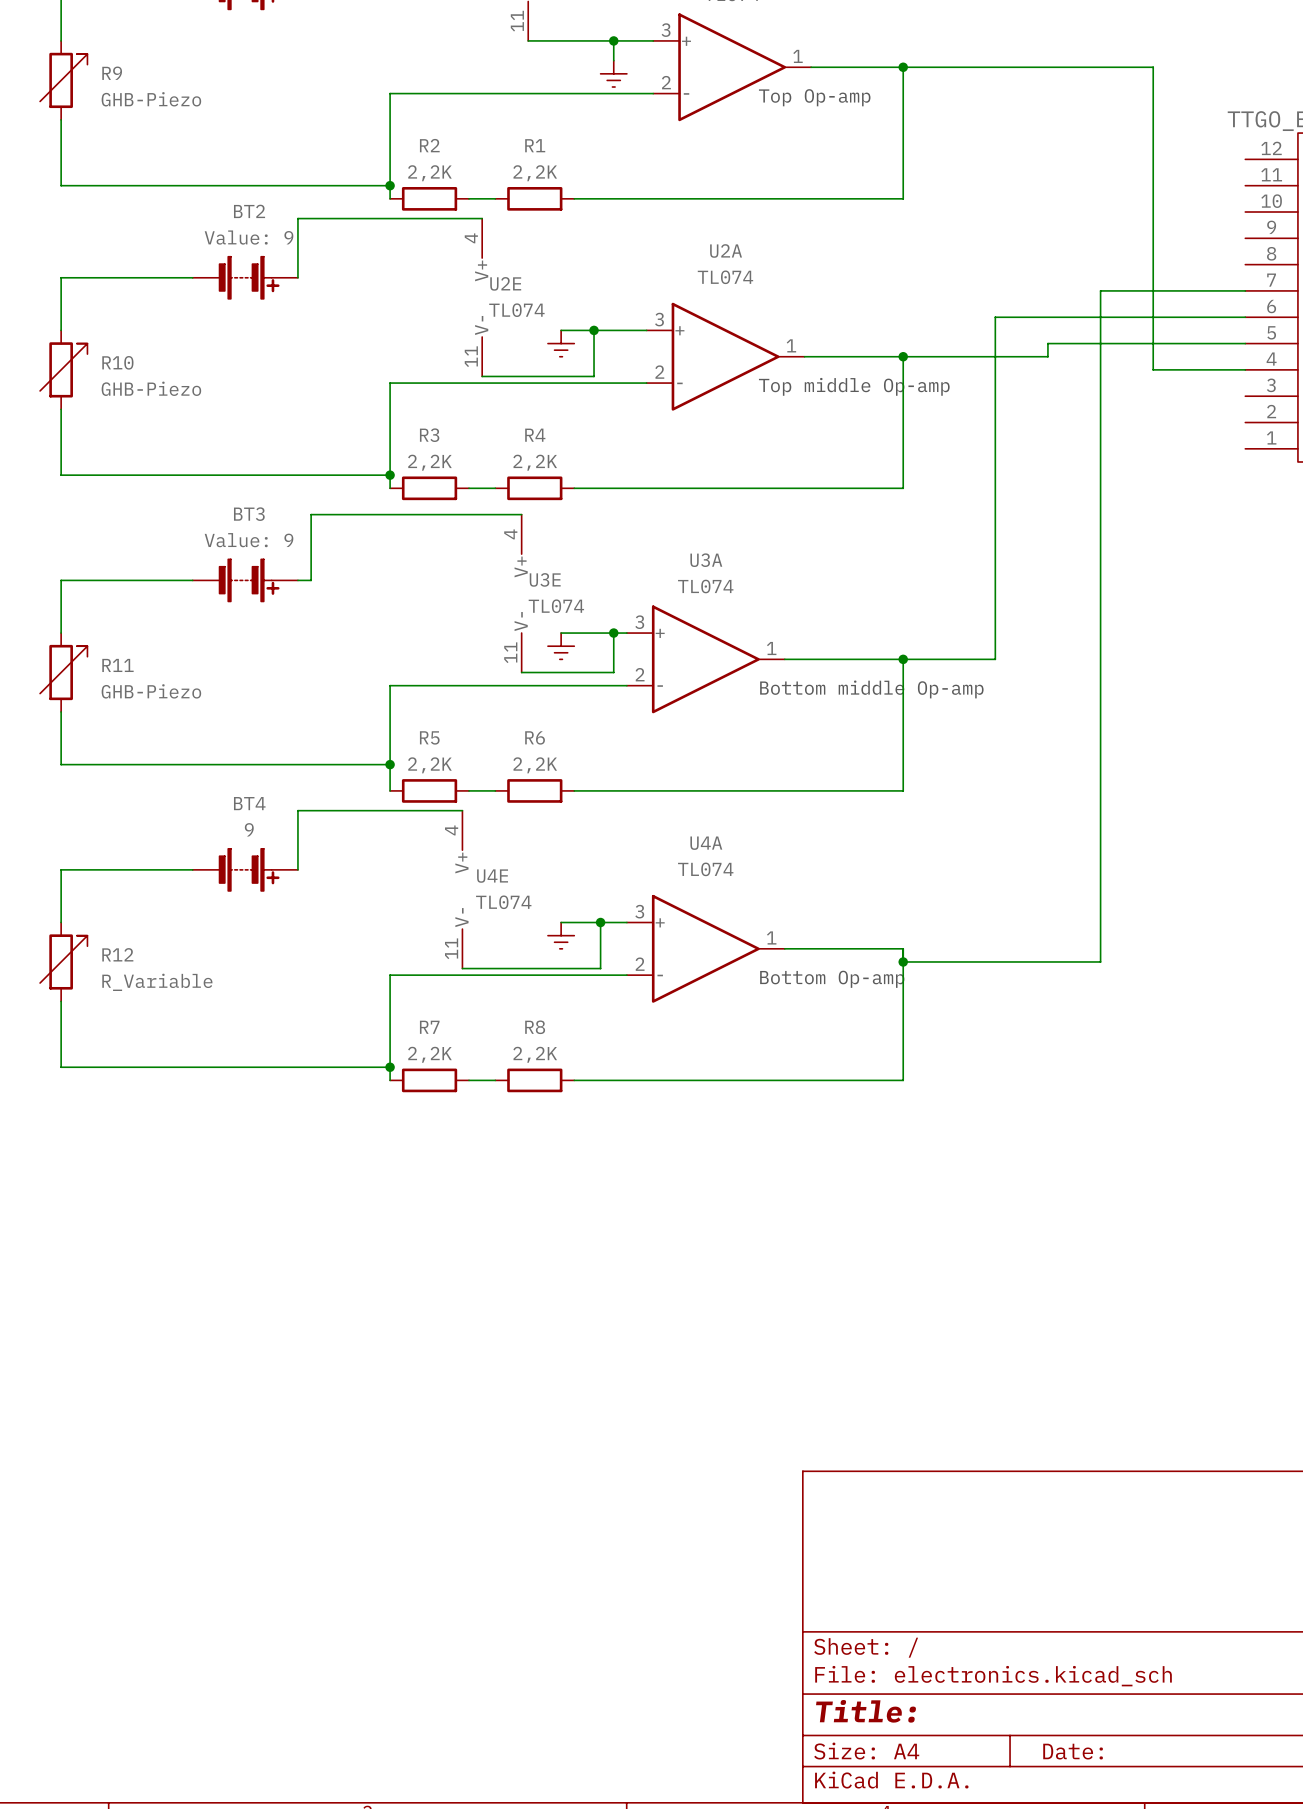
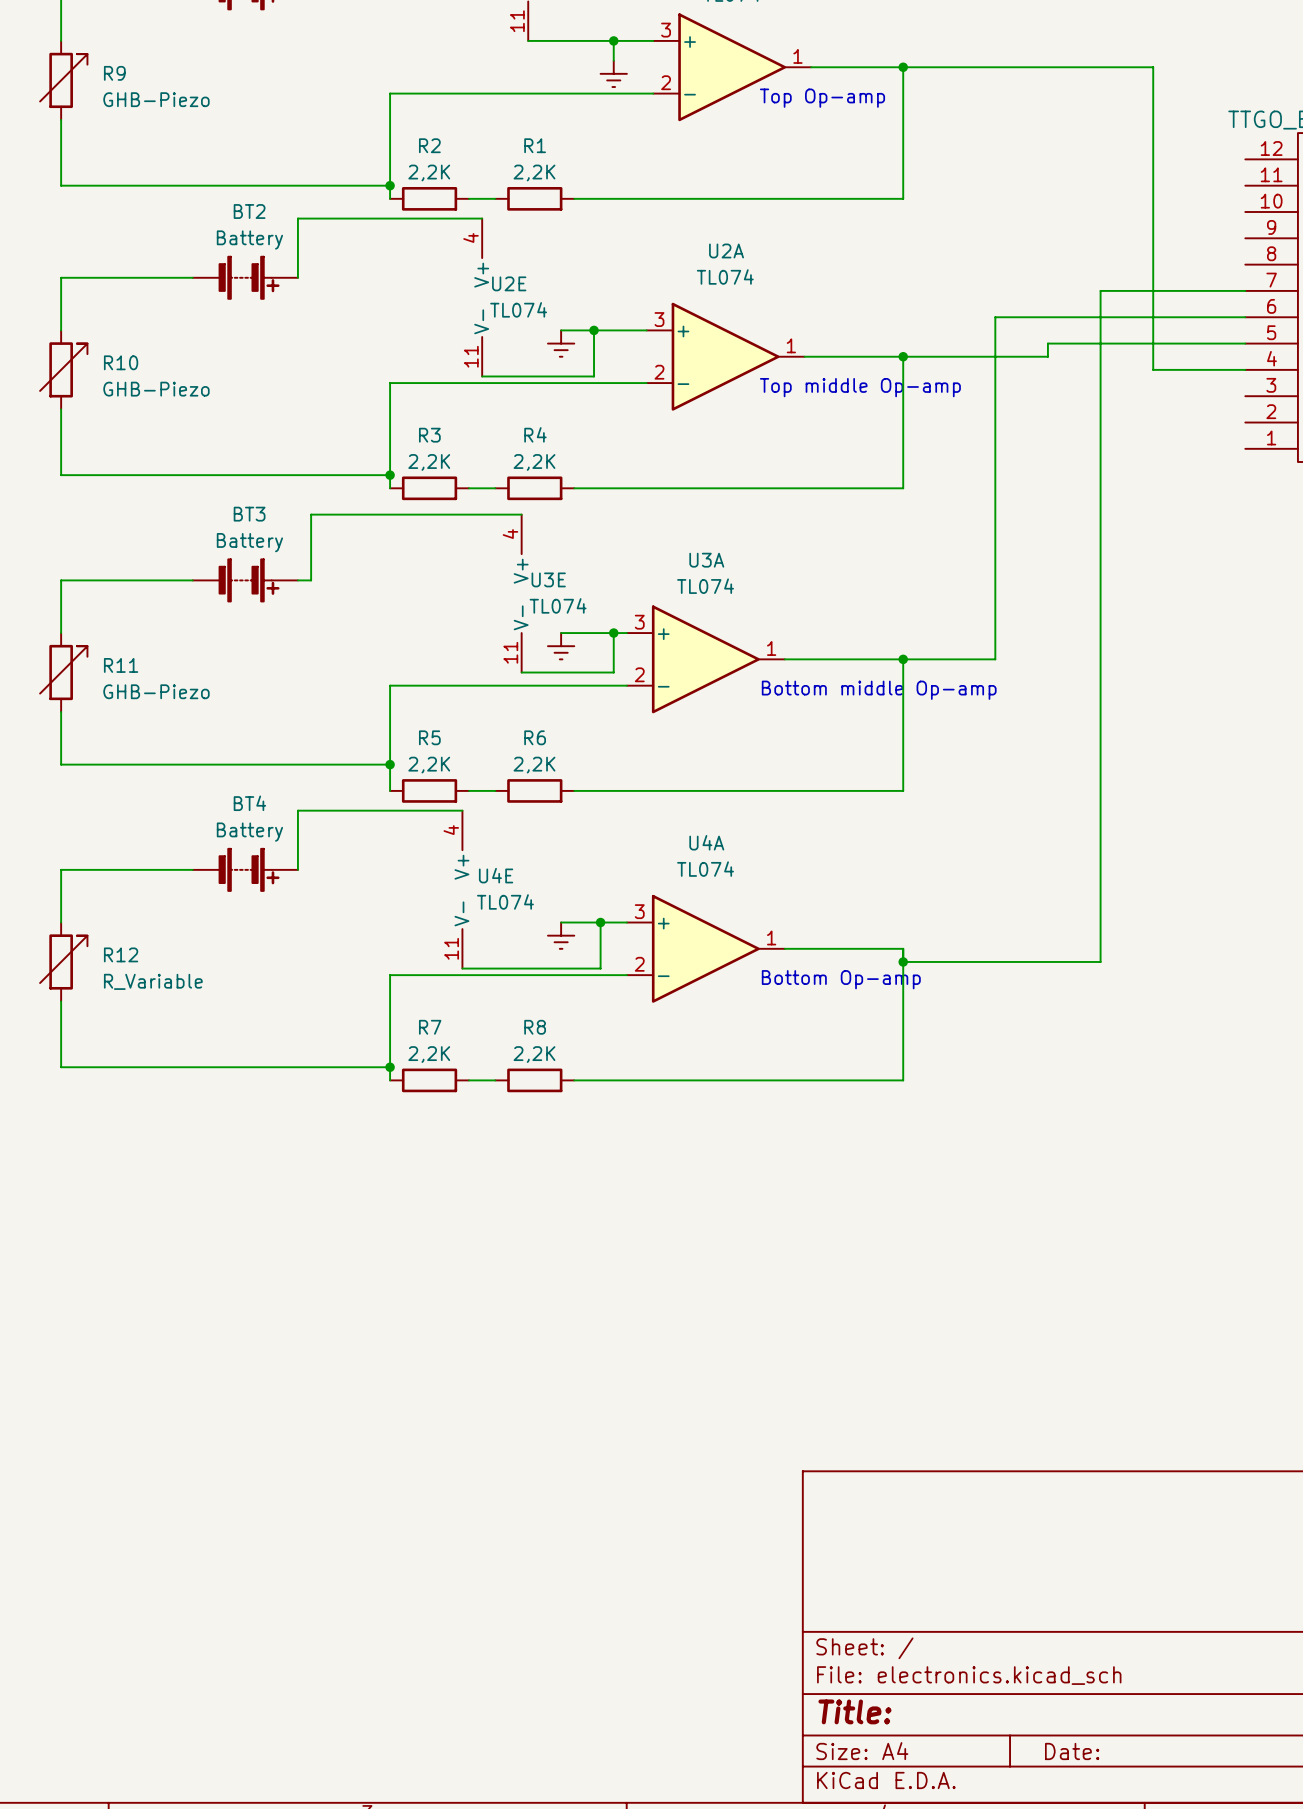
BT2 value: Value: 9 (249, 237) -> Battery (249, 240)
BT3 value: Value: 9 (249, 540) -> Battery (249, 542)
BT4 value: 9 (249, 829) -> Battery (249, 832)

